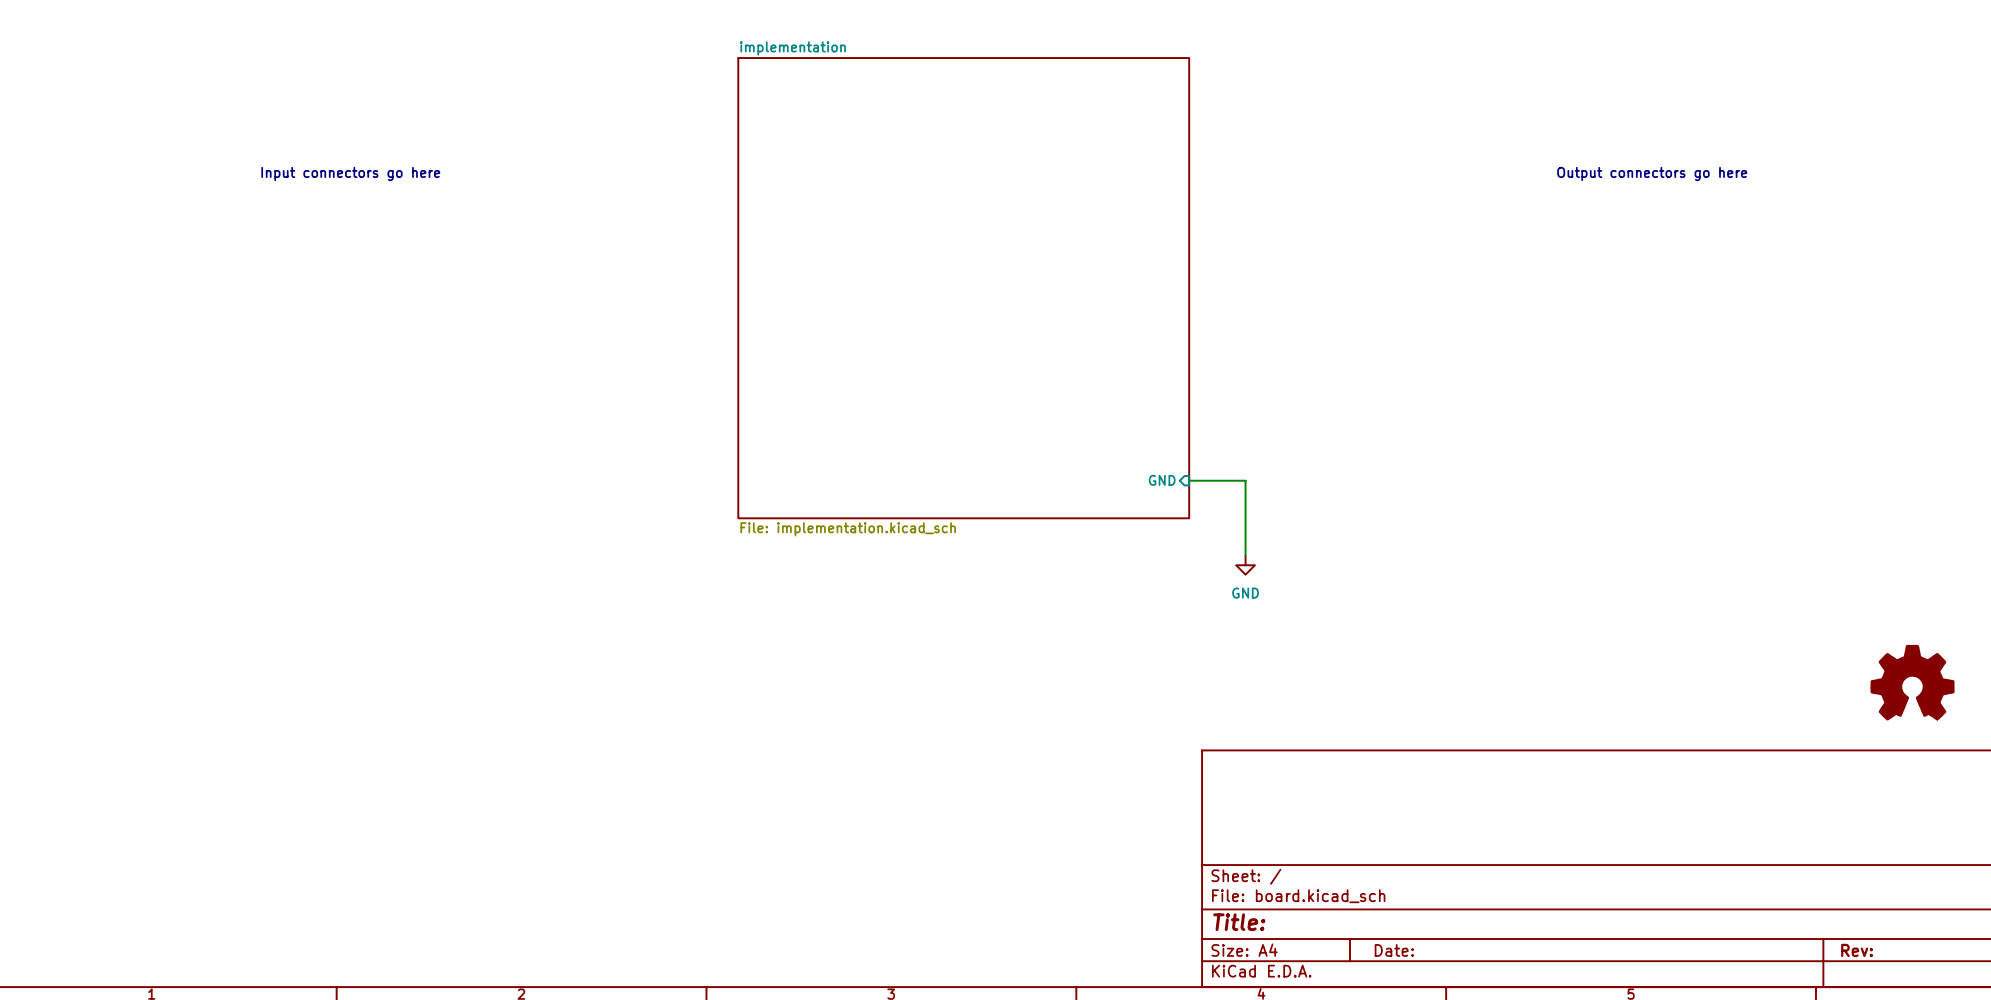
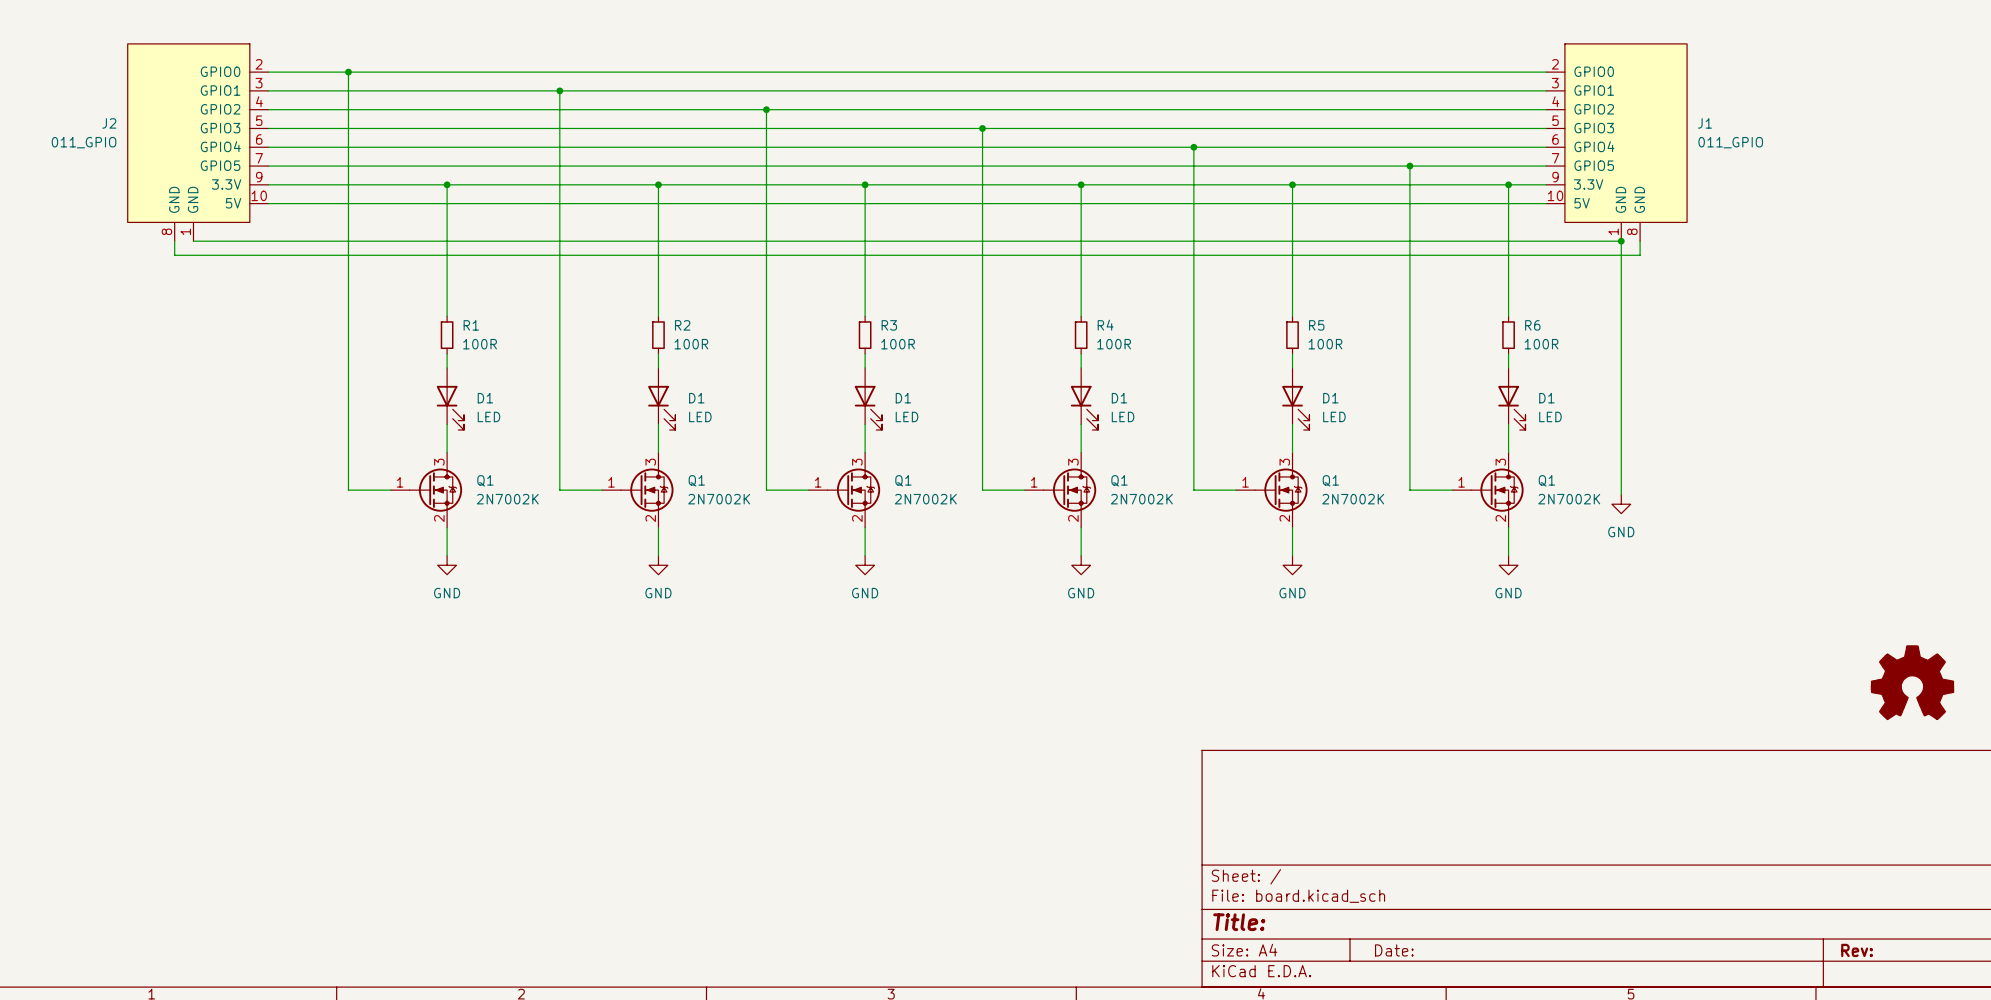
wire: none -> (268, 72) (1546, 72)
wire: none -> (348, 72) (348, 490) (390, 490)
junction: none -> (348, 72)
wire: none -> (268, 90) (1546, 90)
wire: none -> (559, 90) (559, 490) (602, 490)
junction: none -> (559, 90)
wire: none -> (268, 109) (1546, 109)
wire: none -> (766, 109) (766, 490) (808, 490)
junction: none -> (766, 109)
wire: none -> (268, 128) (1546, 128)
wire: none -> (982, 128) (982, 490) (1024, 490)
junction: none -> (982, 128)
J2: none -> 011_GPIO (198, 142)
J1: none -> 011_GPIO (1616, 142)
wire: none -> (268, 147) (1546, 147)
wire: none -> (1193, 147) (1193, 490) (1236, 490)
junction: none -> (1193, 147)
wire: none -> (268, 166) (1546, 166)
wire: none -> (1409, 166) (1409, 490) (1452, 490)
junction: none -> (1409, 166)
text: Input connectors go here (350, 174) -> none
text: Output connectors go here (1652, 174) -> none
wire: none -> (268, 184) (1546, 184)
wire: none -> (447, 184) (447, 316)
junction: none -> (447, 184)
wire: none -> (658, 184) (658, 316)
junction: none -> (658, 184)
wire: none -> (865, 184) (865, 316)
junction: none -> (865, 184)
wire: none -> (1081, 184) (1081, 316)
junction: none -> (1081, 184)
wire: none -> (1292, 184) (1292, 316)
junction: none -> (1292, 184)
wire: none -> (1508, 184) (1508, 316)
junction: none -> (1508, 184)
wire: none -> (268, 203) (1546, 203)
wire: none -> (174, 241) (174, 255) (1640, 255) (1640, 241)
wire: none -> (193, 241) (1621, 241) (1621, 494)
junction: none -> (1621, 241)
sheet implementation: File: implementation.kicad_sch (963, 288) -> none
R1: none -> 100R (447, 335)
R2: none -> 100R (658, 335)
R3: none -> 100R (865, 335)
R4: none -> 100R (1081, 335)
R5: none -> 100R (1292, 335)
R6: none -> 100R (1508, 335)
wire: none -> (447, 353) (447, 368)
wire: none -> (658, 353) (658, 368)
wire: none -> (865, 353) (865, 368)
wire: none -> (1081, 353) (1081, 368)
wire: none -> (1292, 353) (1292, 368)
wire: none -> (1508, 353) (1508, 368)
D1: none -> LED (450, 399)
D1: none -> LED (661, 399)
D1: none -> LED (868, 399)
D1: none -> LED (1084, 399)
D1: none -> LED (1295, 399)
D1: none -> LED (1511, 399)
wire: none -> (447, 424) (447, 452)
wire: none -> (658, 424) (658, 452)
wire: none -> (865, 424) (865, 452)
wire: none -> (1081, 424) (1081, 452)
wire: none -> (1292, 424) (1292, 452)
wire: none -> (1508, 424) (1508, 452)
sheet pin: GND (1162, 480) -> none
wire: (1189, 480) (1245, 480) (1245, 555) -> none
Q1: none -> 2N7002K (426, 490)
Q1: none -> 2N7002K (637, 490)
Q1: none -> 2N7002K (844, 490)
Q1: none -> 2N7002K (1060, 490)
Q1: none -> 2N7002K (1271, 490)
Q1: none -> 2N7002K (1487, 490)
power symbol: none -> GND (1621, 504)
wire: none -> (447, 527) (447, 555)
wire: none -> (658, 527) (658, 555)
wire: none -> (865, 527) (865, 555)
wire: none -> (1081, 527) (1081, 555)
wire: none -> (1292, 527) (1292, 555)
wire: none -> (1508, 527) (1508, 555)
power symbol: none -> GND (447, 565)
power symbol: none -> GND (658, 565)
power symbol: none -> GND (865, 565)
power symbol: none -> GND (1081, 565)
power symbol position: GND (1245, 565) -> GND (1292, 565)
power symbol: none -> GND (1508, 565)

